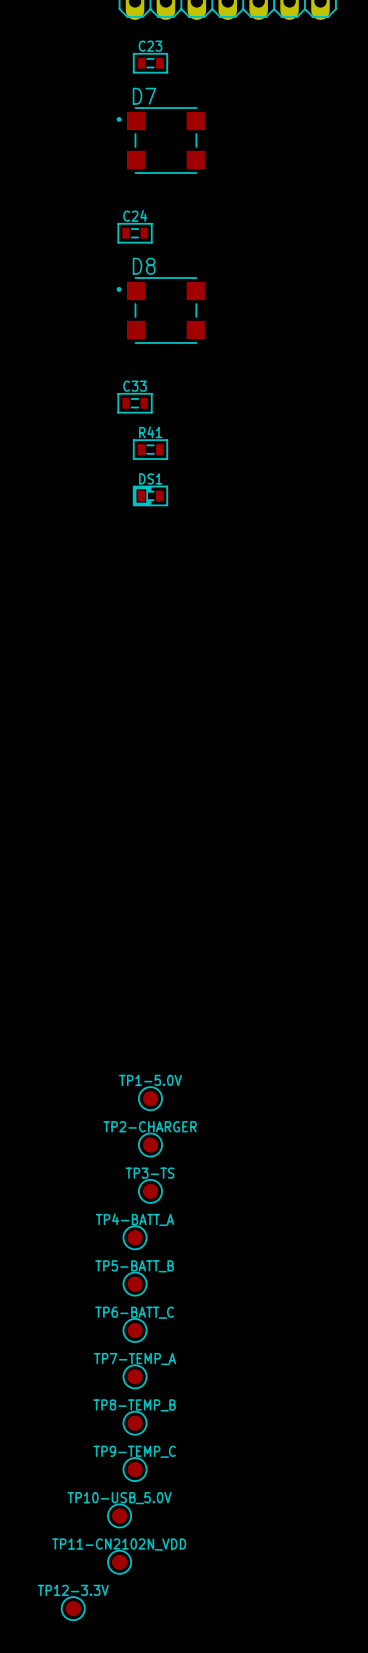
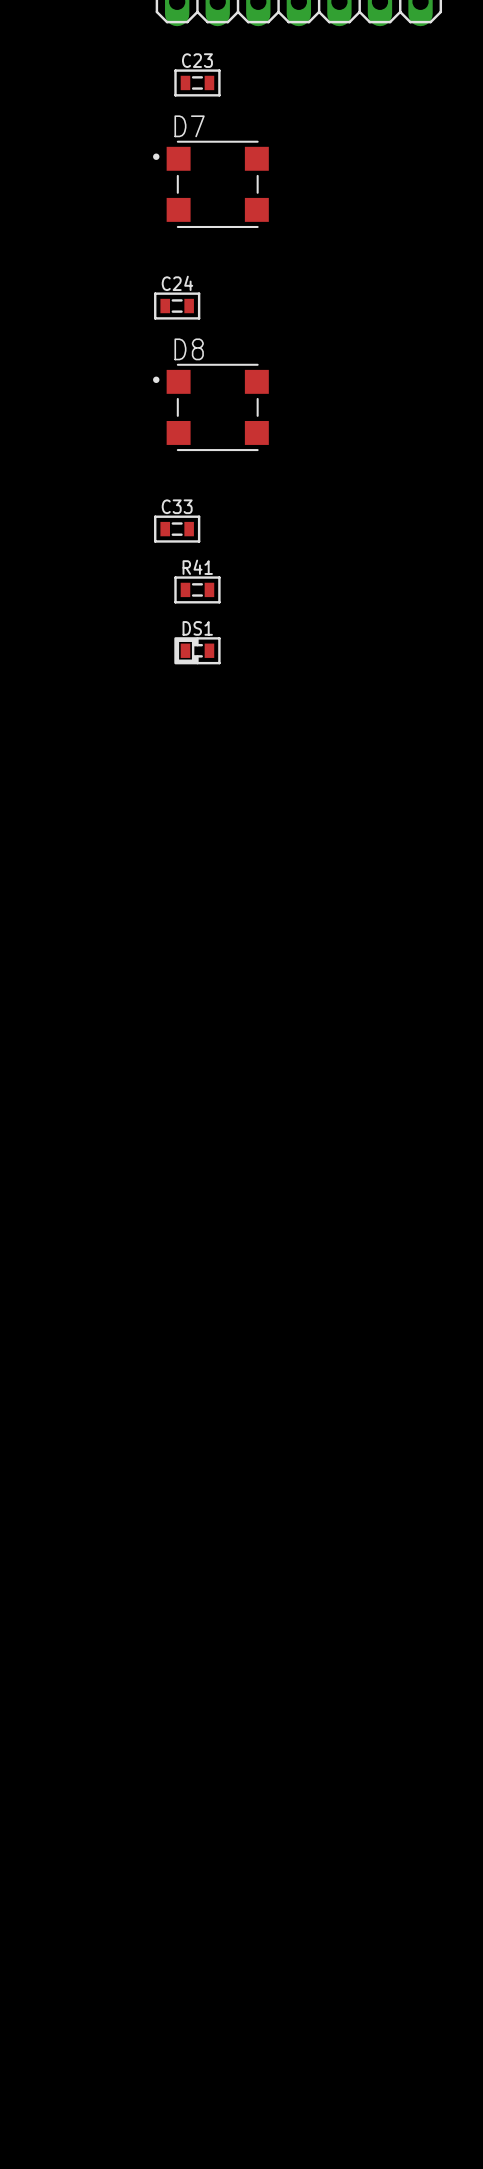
TP1-5.0V: (150, 1098) -> none
TP2-CHARGER: (150, 1145) -> none
TP3-TS: (150, 1191) -> none
TP4-BATT_A: (135, 1237) -> none
TP5-BATT_B: (135, 1284) -> none
TP6-BATT_C: (135, 1330) -> none
TP7-TEMP_A: (135, 1376) -> none
TP8-TEMP_B: (135, 1423) -> none
TP9-TEMP_C: (135, 1469) -> none
TP10-USB_5.0V: (119, 1515) -> none
TP11-CN2102N_VDD: (119, 1562) -> none
TP12-3.3V: (73, 1608) -> none

